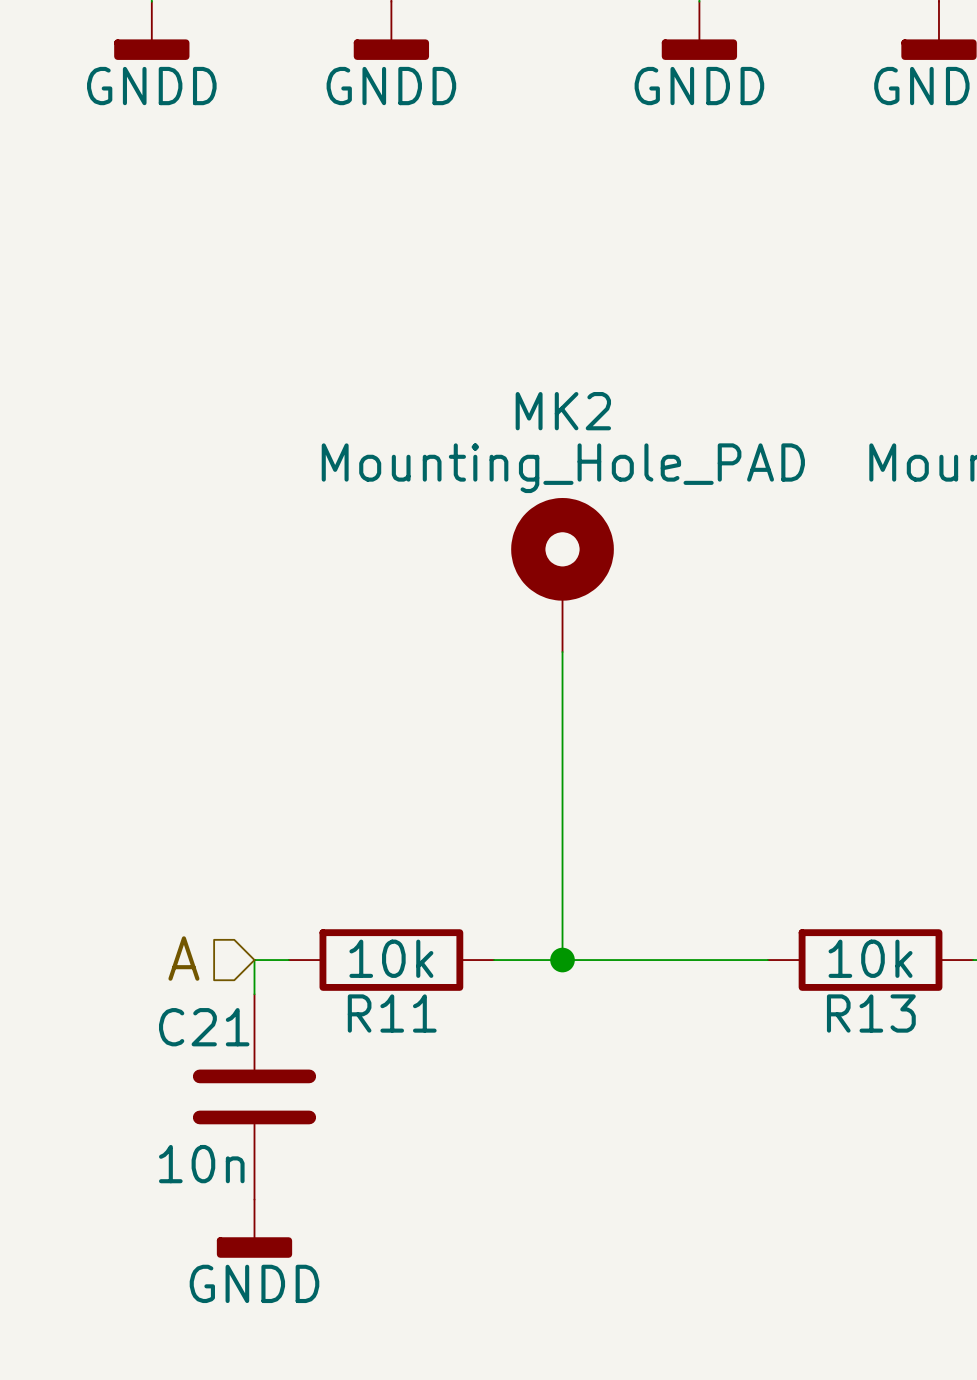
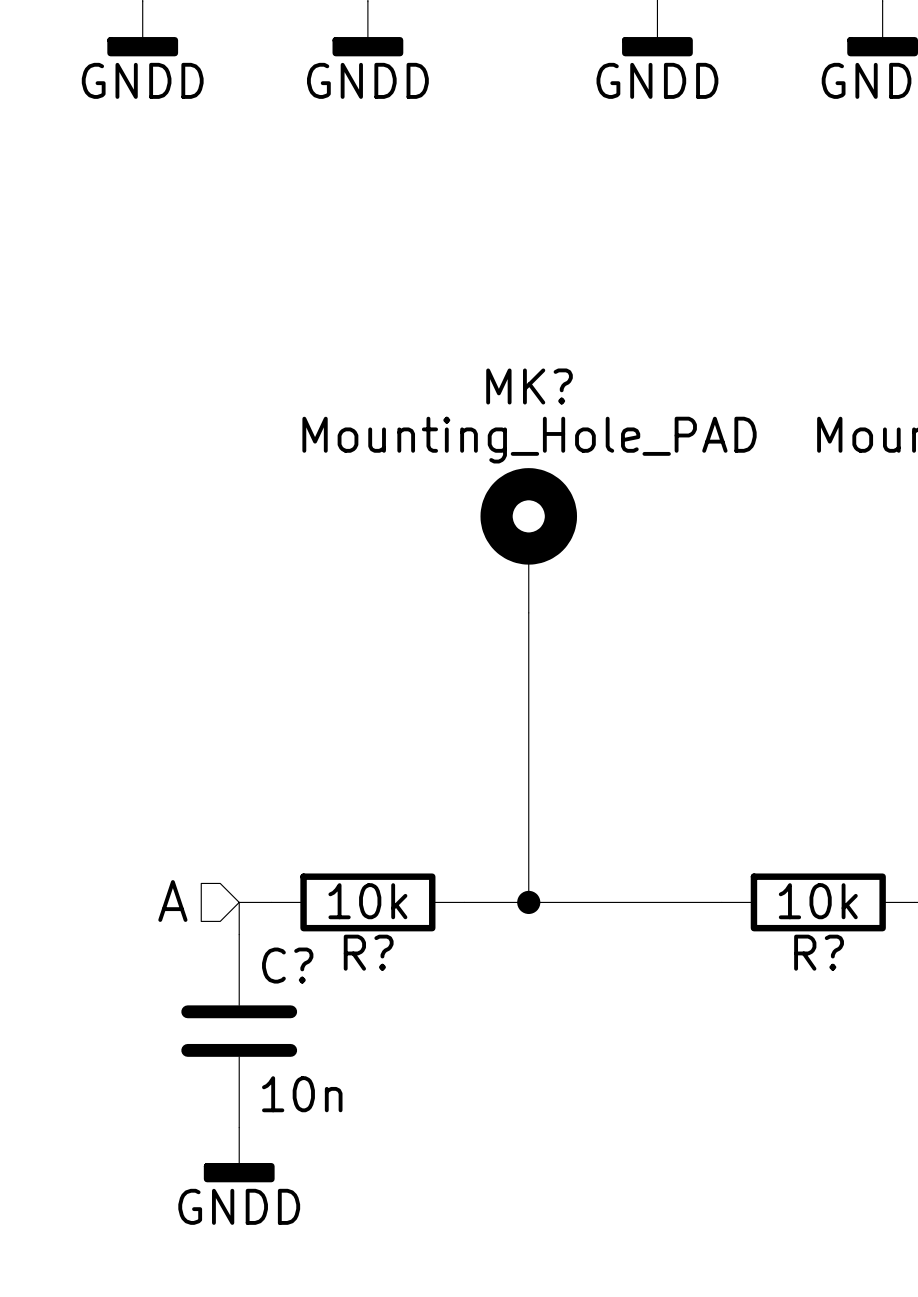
MK2 name: MK2 (563, 411) -> MK? (529, 386)
R11 name: R11 (392, 1013) -> R? (368, 952)
R13 name: R13 (871, 1013) -> R? (819, 952)
C21 name: C21 (204, 1027) -> C? (287, 965)
C21 value position: 10n (201, 1164) -> 10n (302, 1094)

